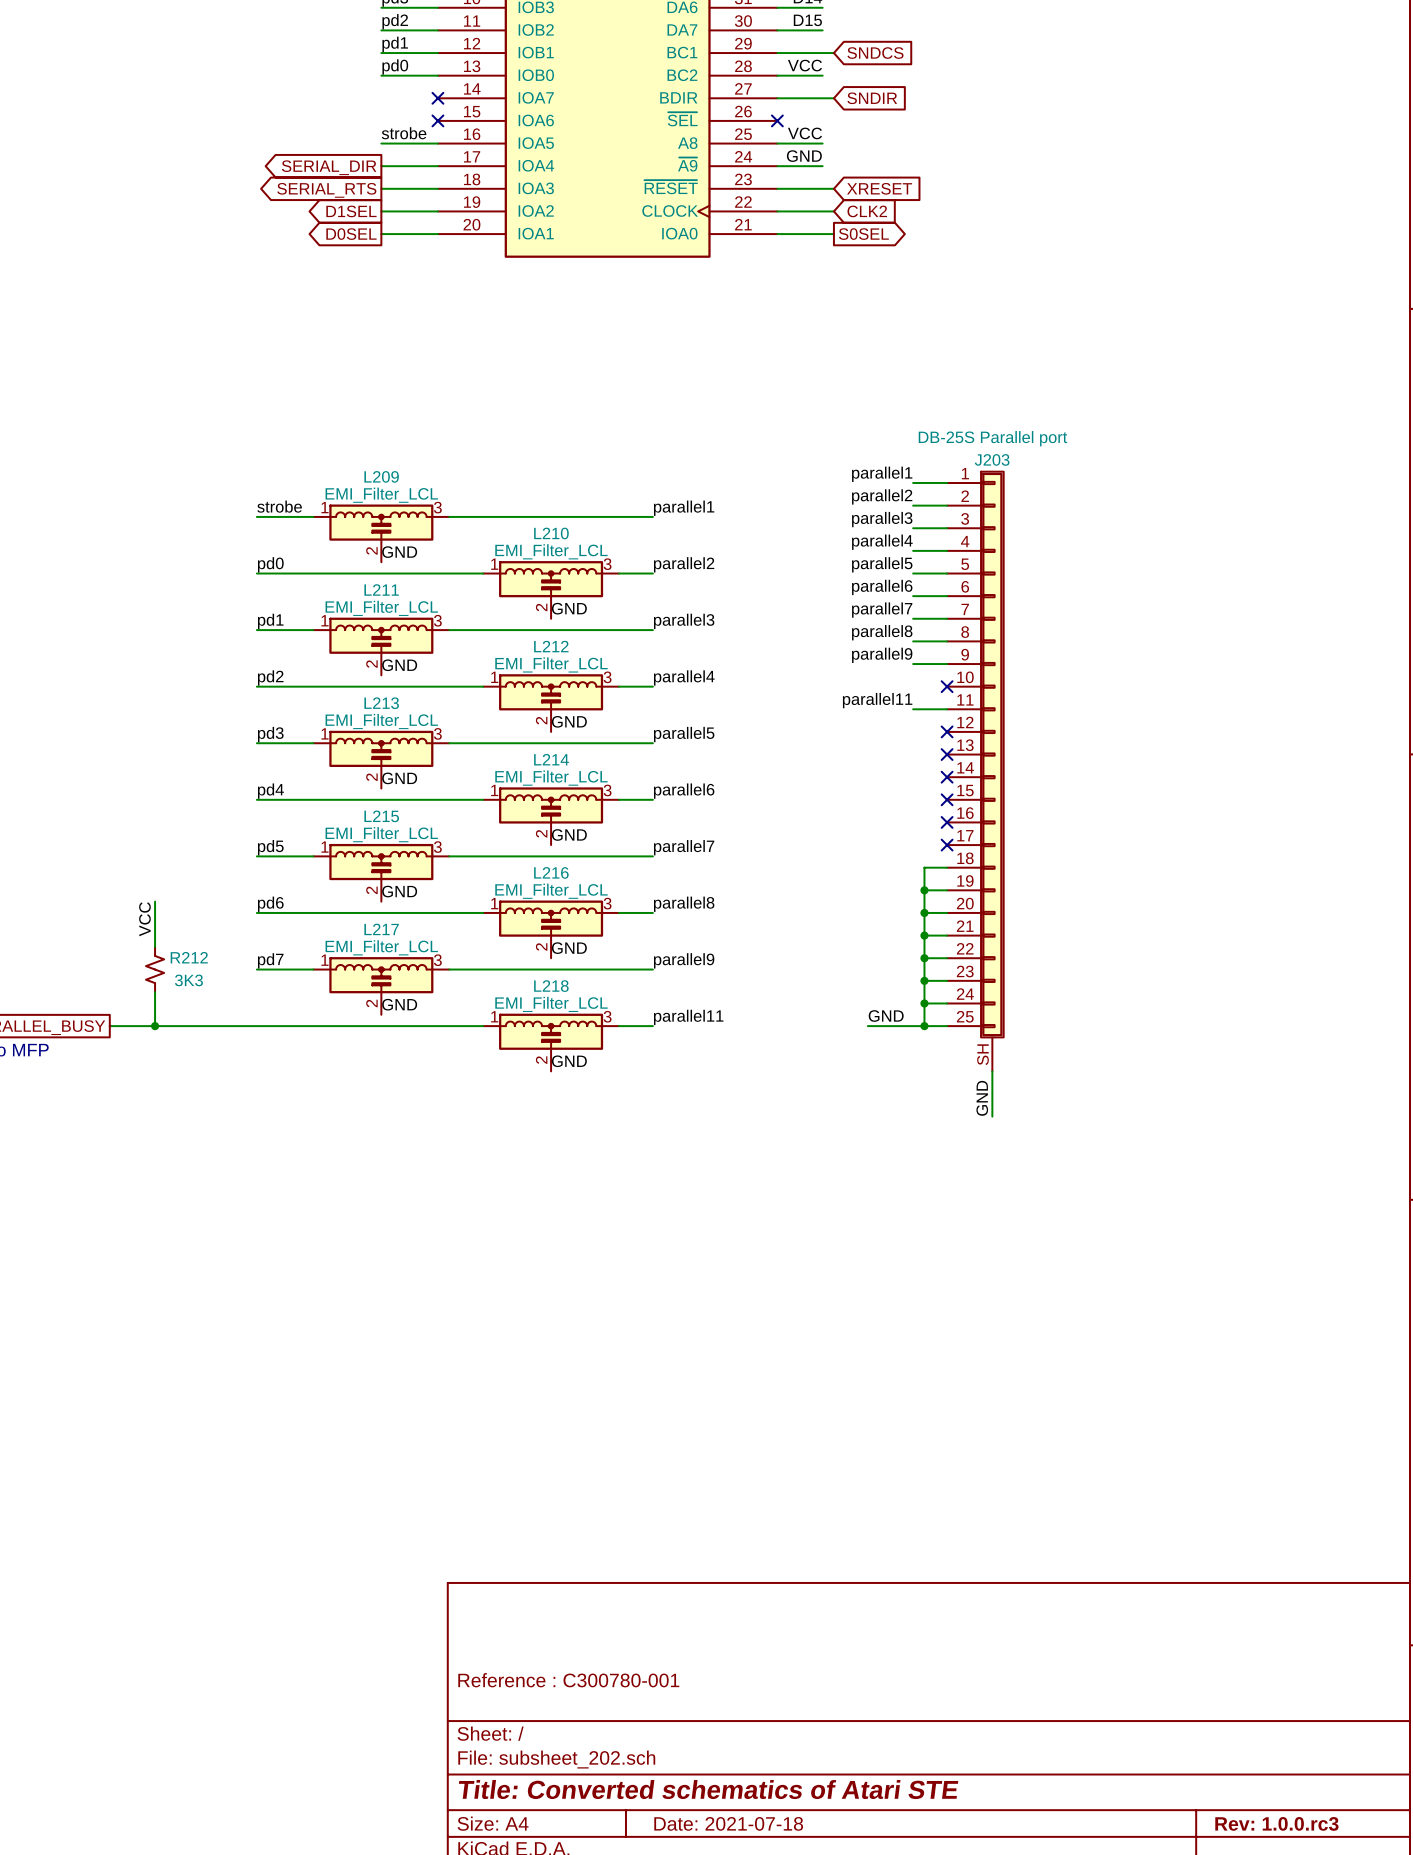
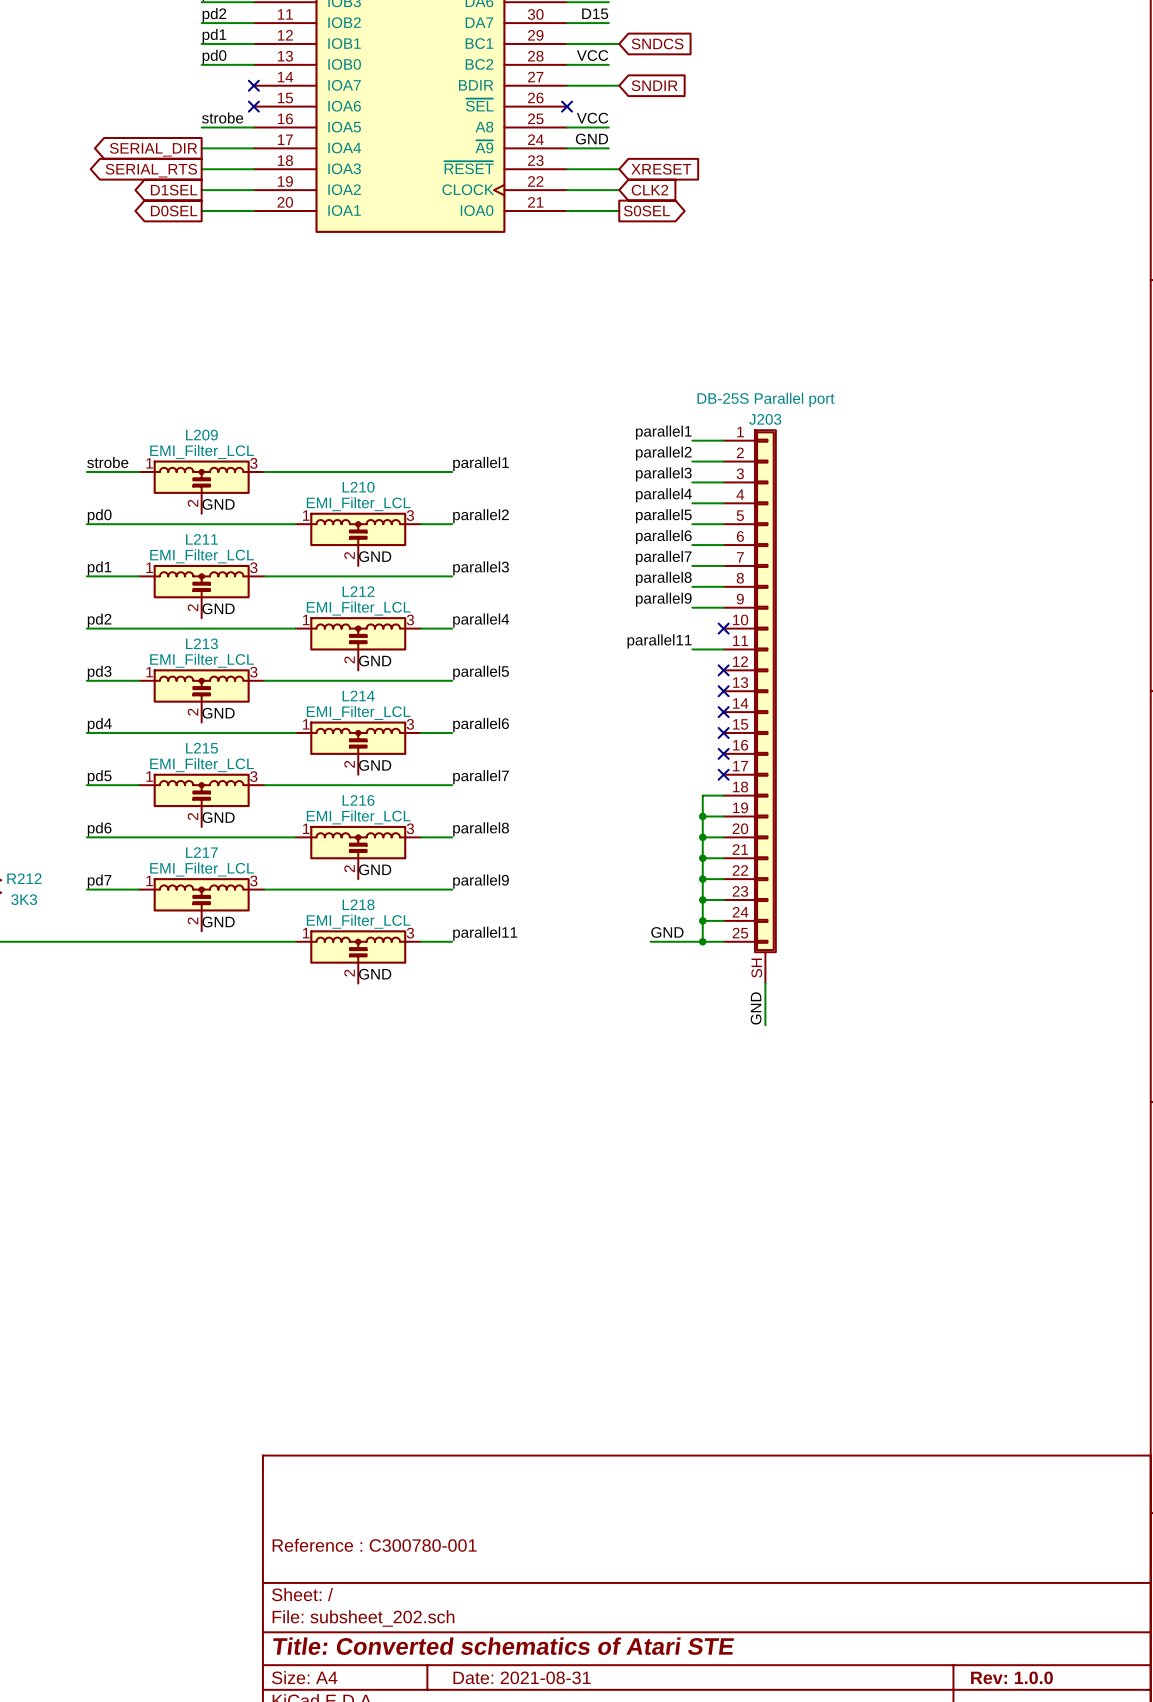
title block: Date: 2021-07-18 (728, 1823) -> Date: 2021-08-31 (522, 1677)
title block: Rev: 1.0.0.rc3 (1276, 1823) -> Rev: 1.0.0 (1011, 1677)

